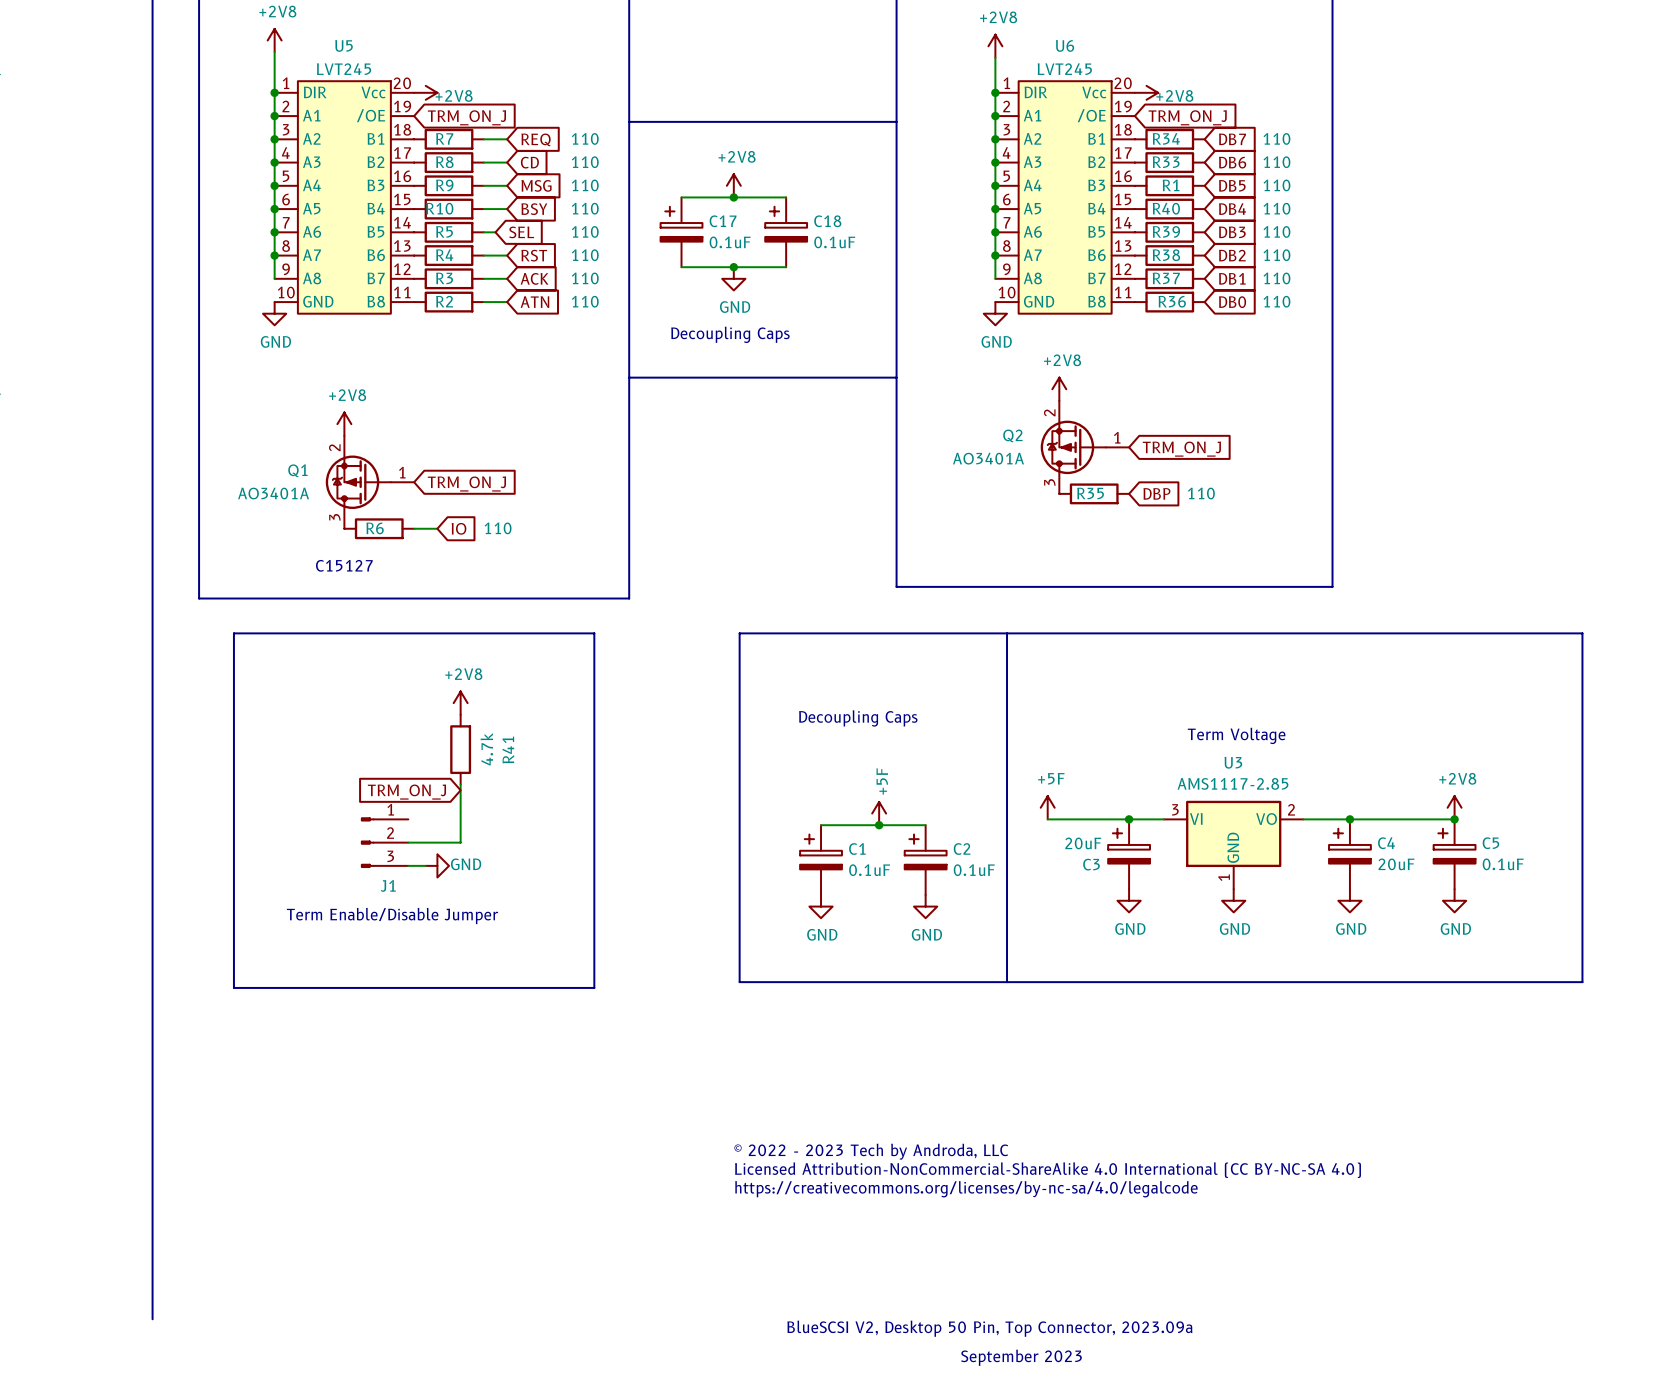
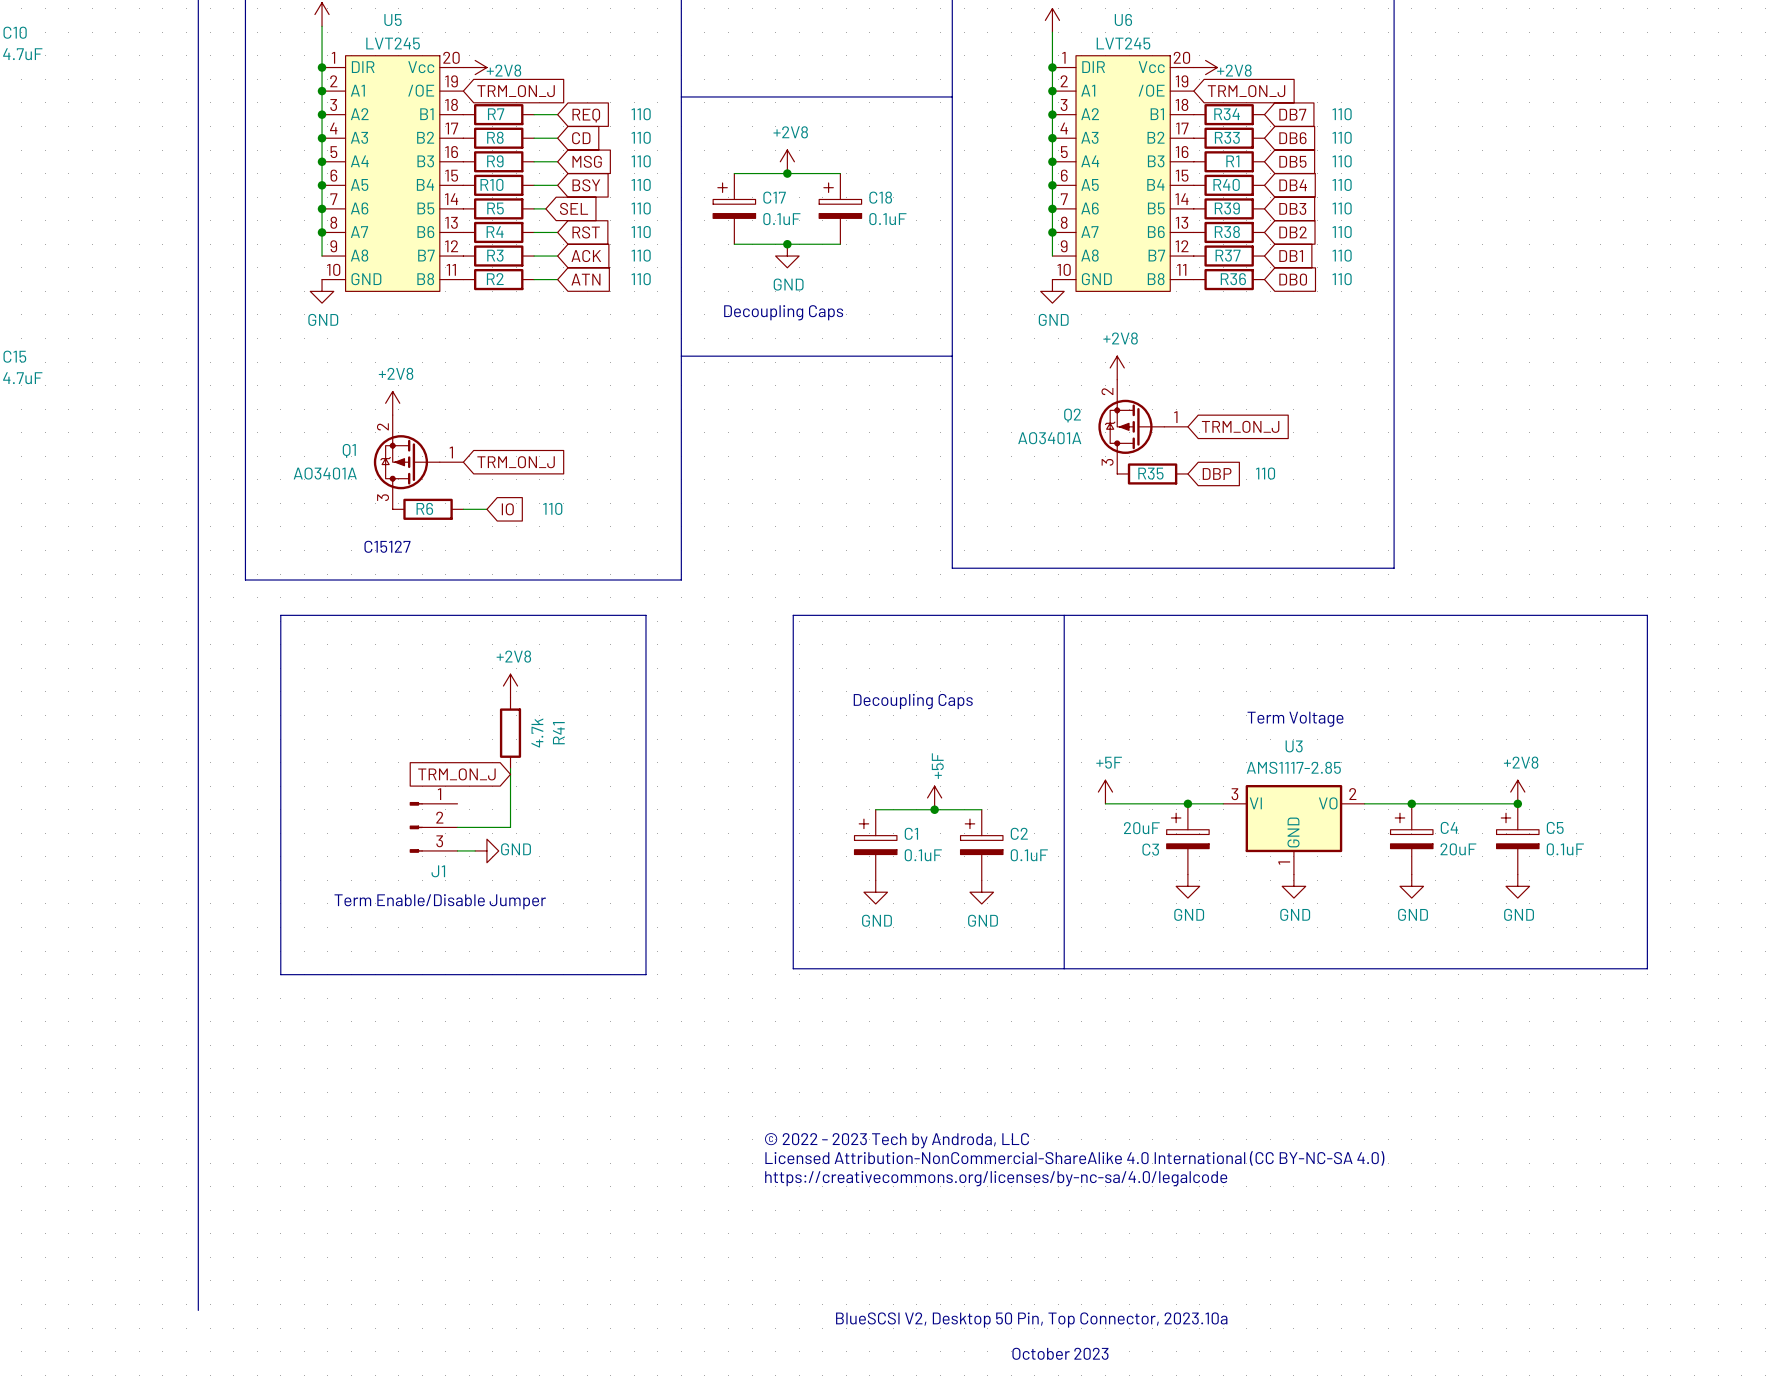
text position: © 2022 - 2023 Tech by Androda, LLC (871, 1151) -> © 2022 - 2023 Tech by Androda, LLC (896, 1140)
text position: Licensed Attribution-NonCommercial-ShareAlike 4.0 International (CC BY-NC-SA 4.0) (1048, 1170) -> Licensed Attribution-NonCommercial-ShareAlike 4.0 International (CC BY-NC-SA 4.0) (1074, 1158)
text position: https://creativecommons.org/licenses/by-nc-sa/4.0/legalcode (966, 1189) -> https://creativecommons.org/licenses/by-nc-sa/4.0/legalcode (996, 1178)
text: BlueSCSI V2, Desktop 50 Pin, Top Connector, 2023.09a (989, 1328) -> BlueSCSI V2, Desktop 50 Pin, Top Connector, 2023.10a (1031, 1319)
text: September 2023 (1021, 1357) -> October 2023 (1060, 1353)

